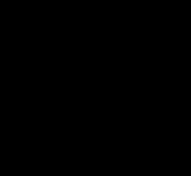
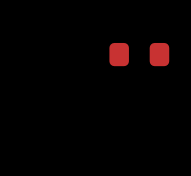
part: none -> (139, 54)

